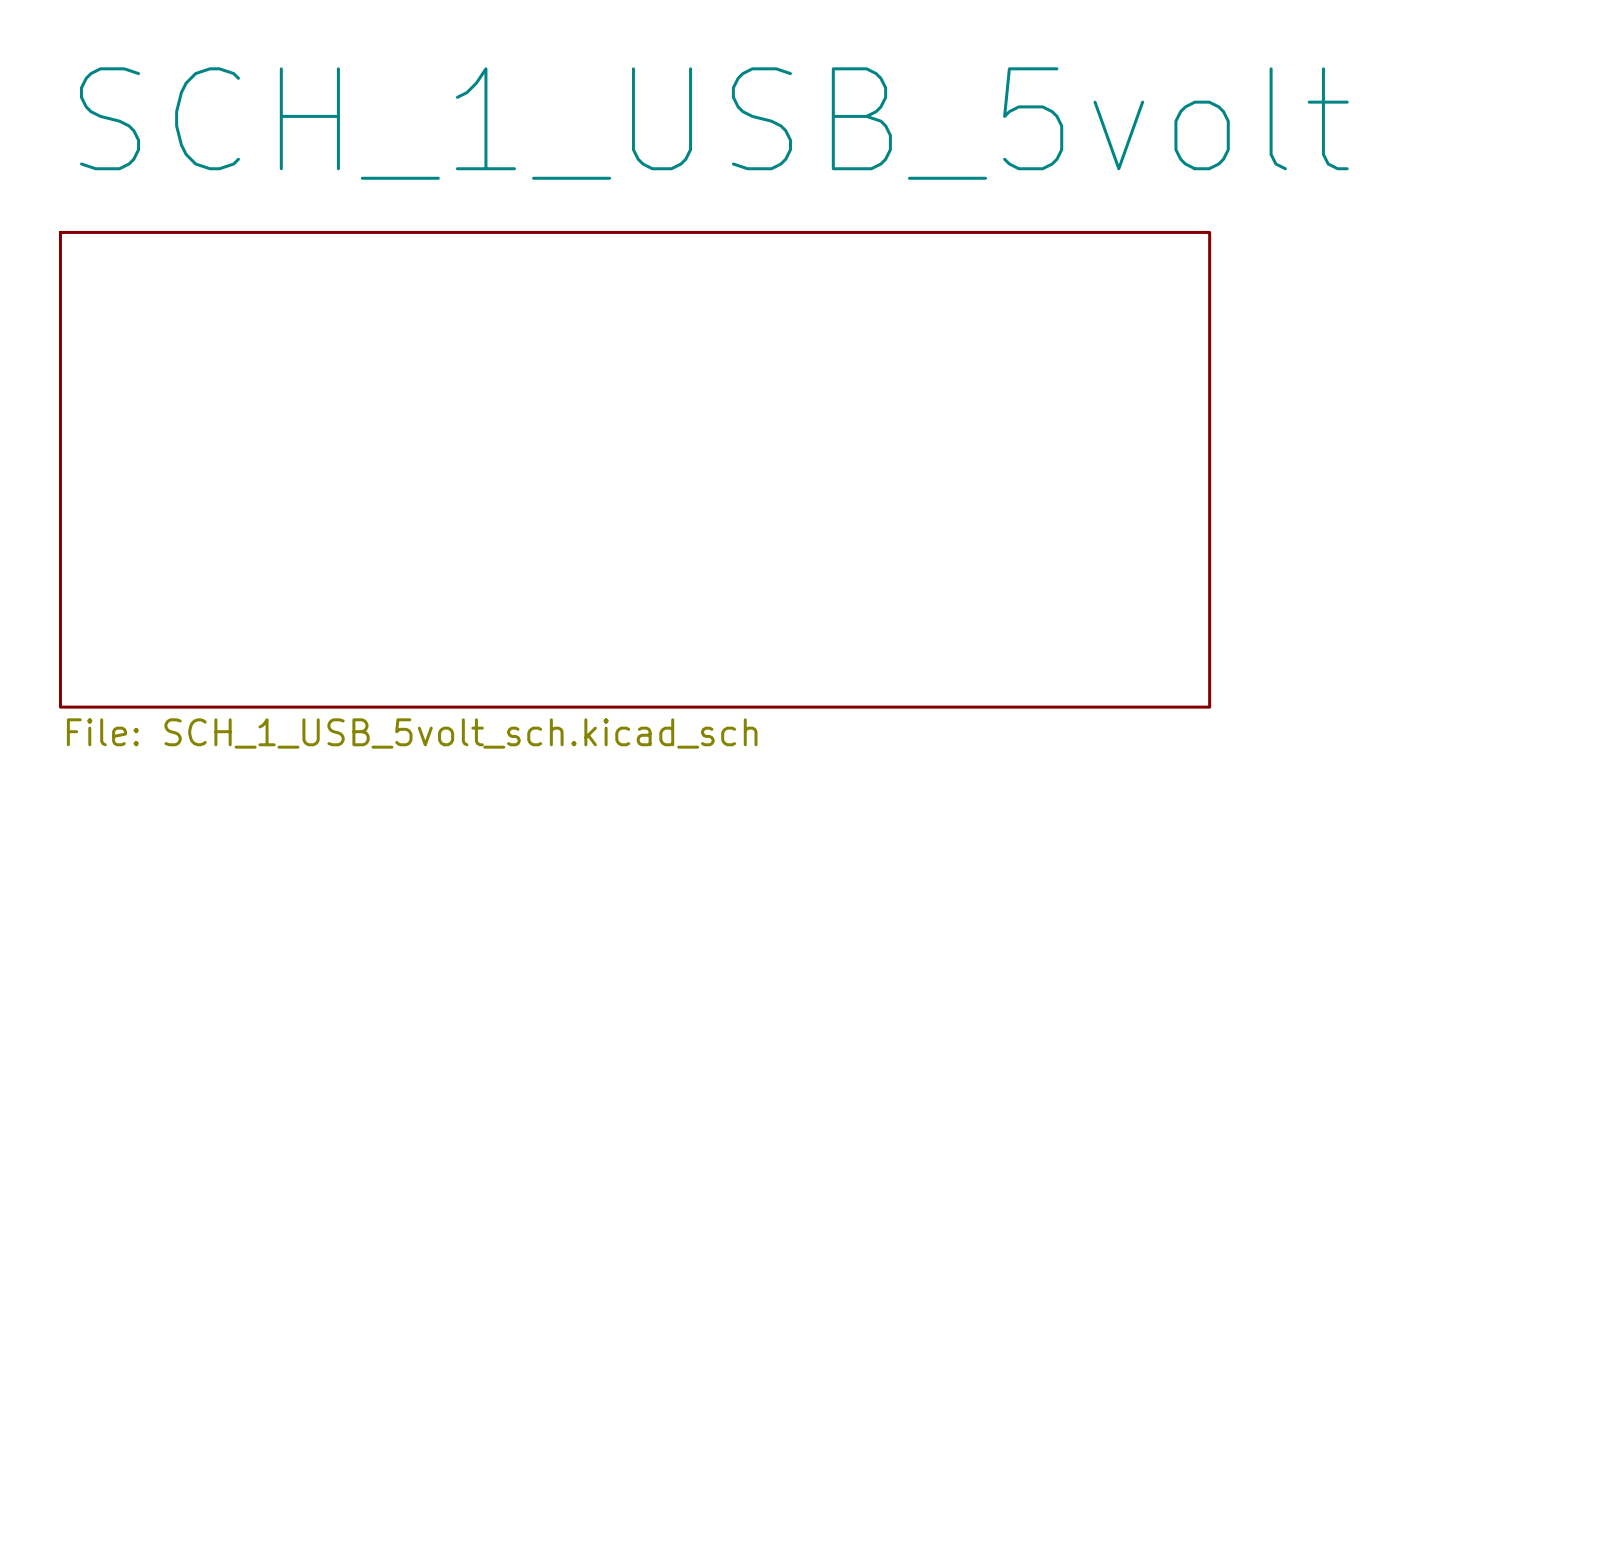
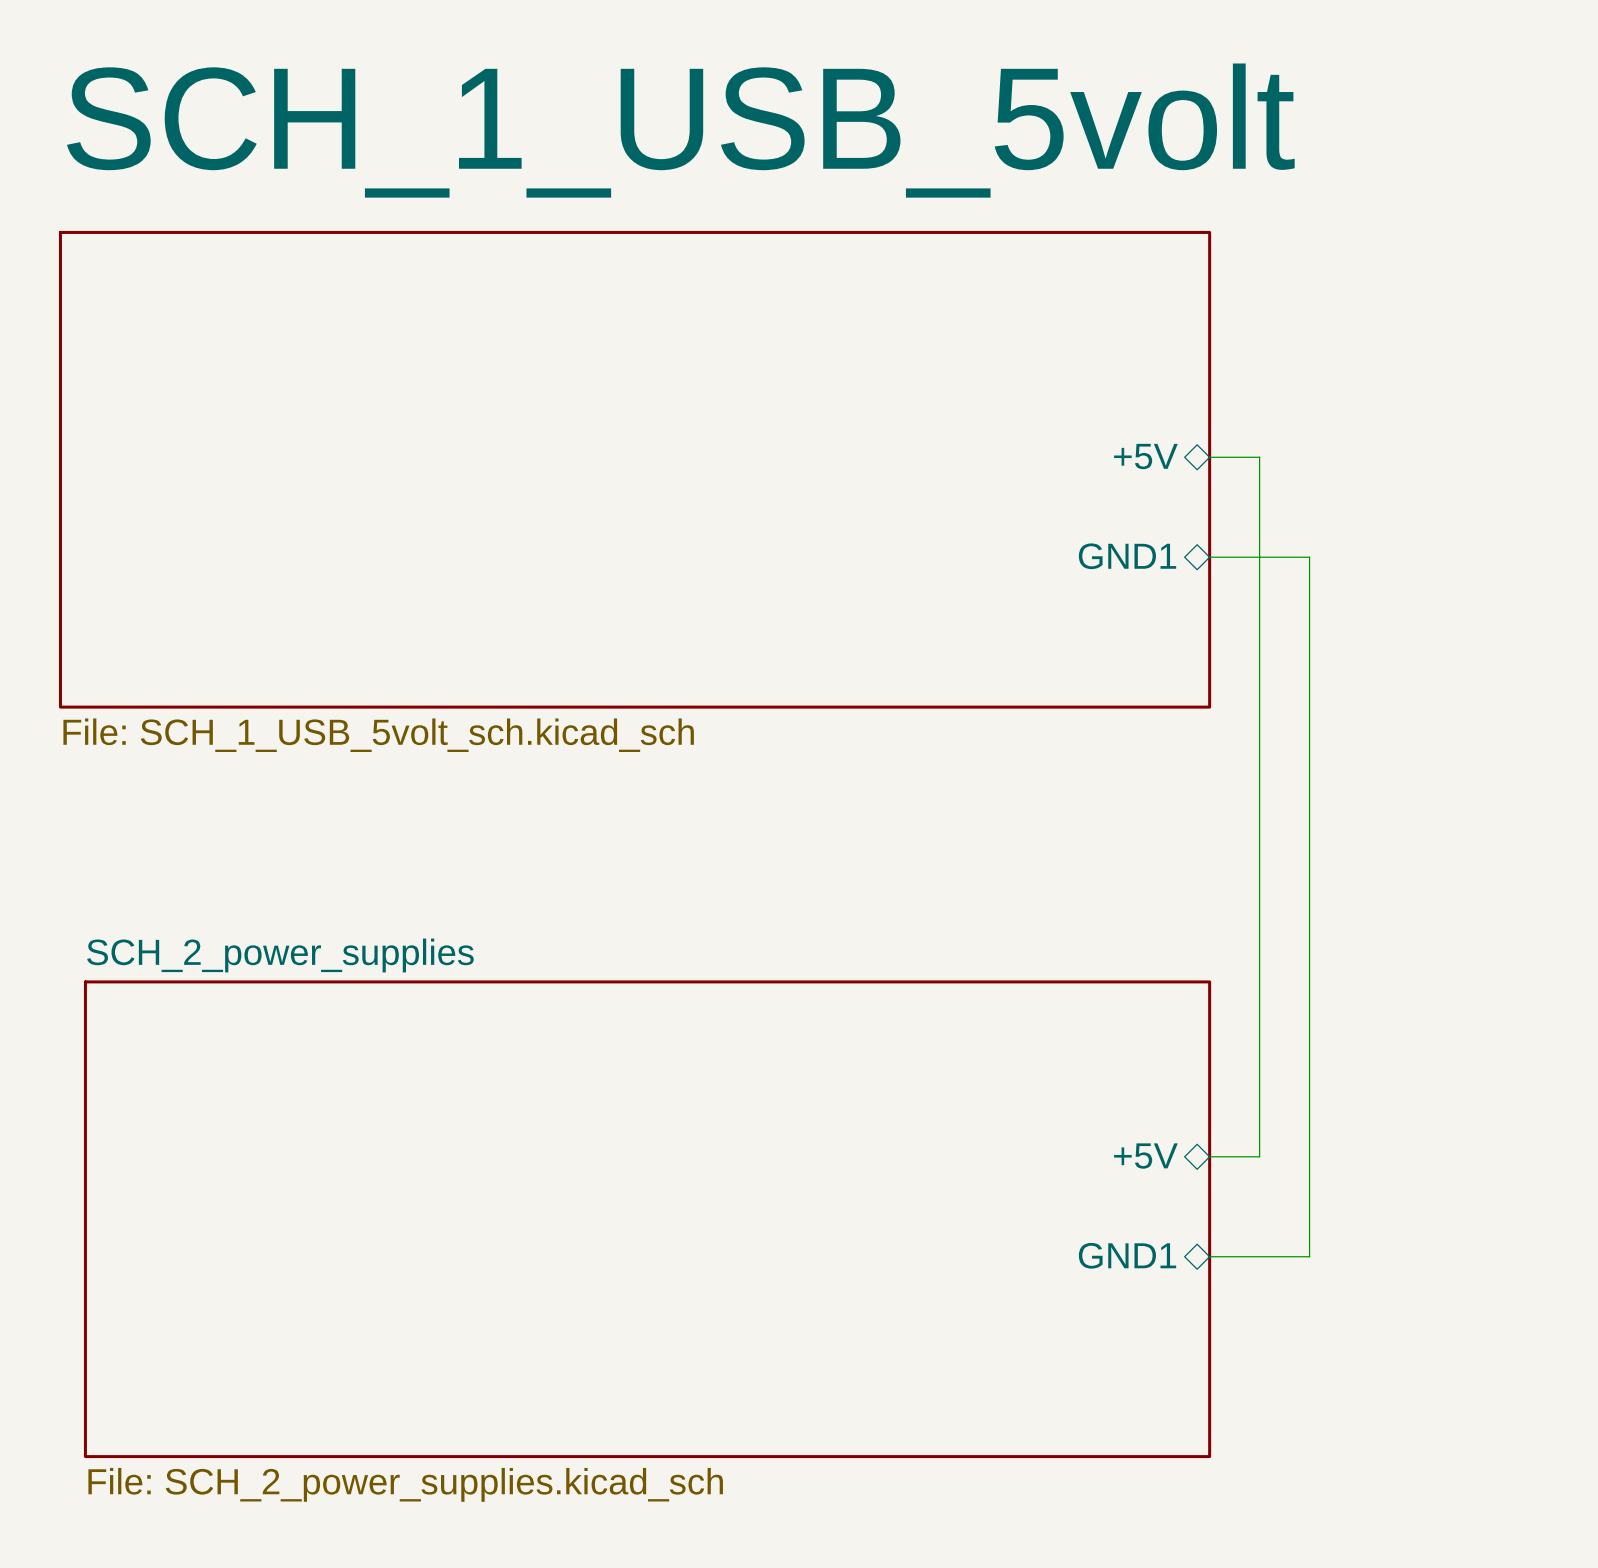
sheet pin: none -> +5V (1145, 456)
wire: none -> (1209, 457) (1259, 457) (1259, 1156) (1209, 1156)
sheet pin: none -> GND1 (1127, 556)
wire: none -> (1209, 557) (1309, 557) (1309, 1256) (1209, 1256)
sheet pin: none -> +5V (1145, 1156)
sheet SCH_2_power_supplies: none -> File: SCH_2_power_supplies.kicad_sch (647, 1219)
sheet pin: none -> GND1 (1127, 1255)

